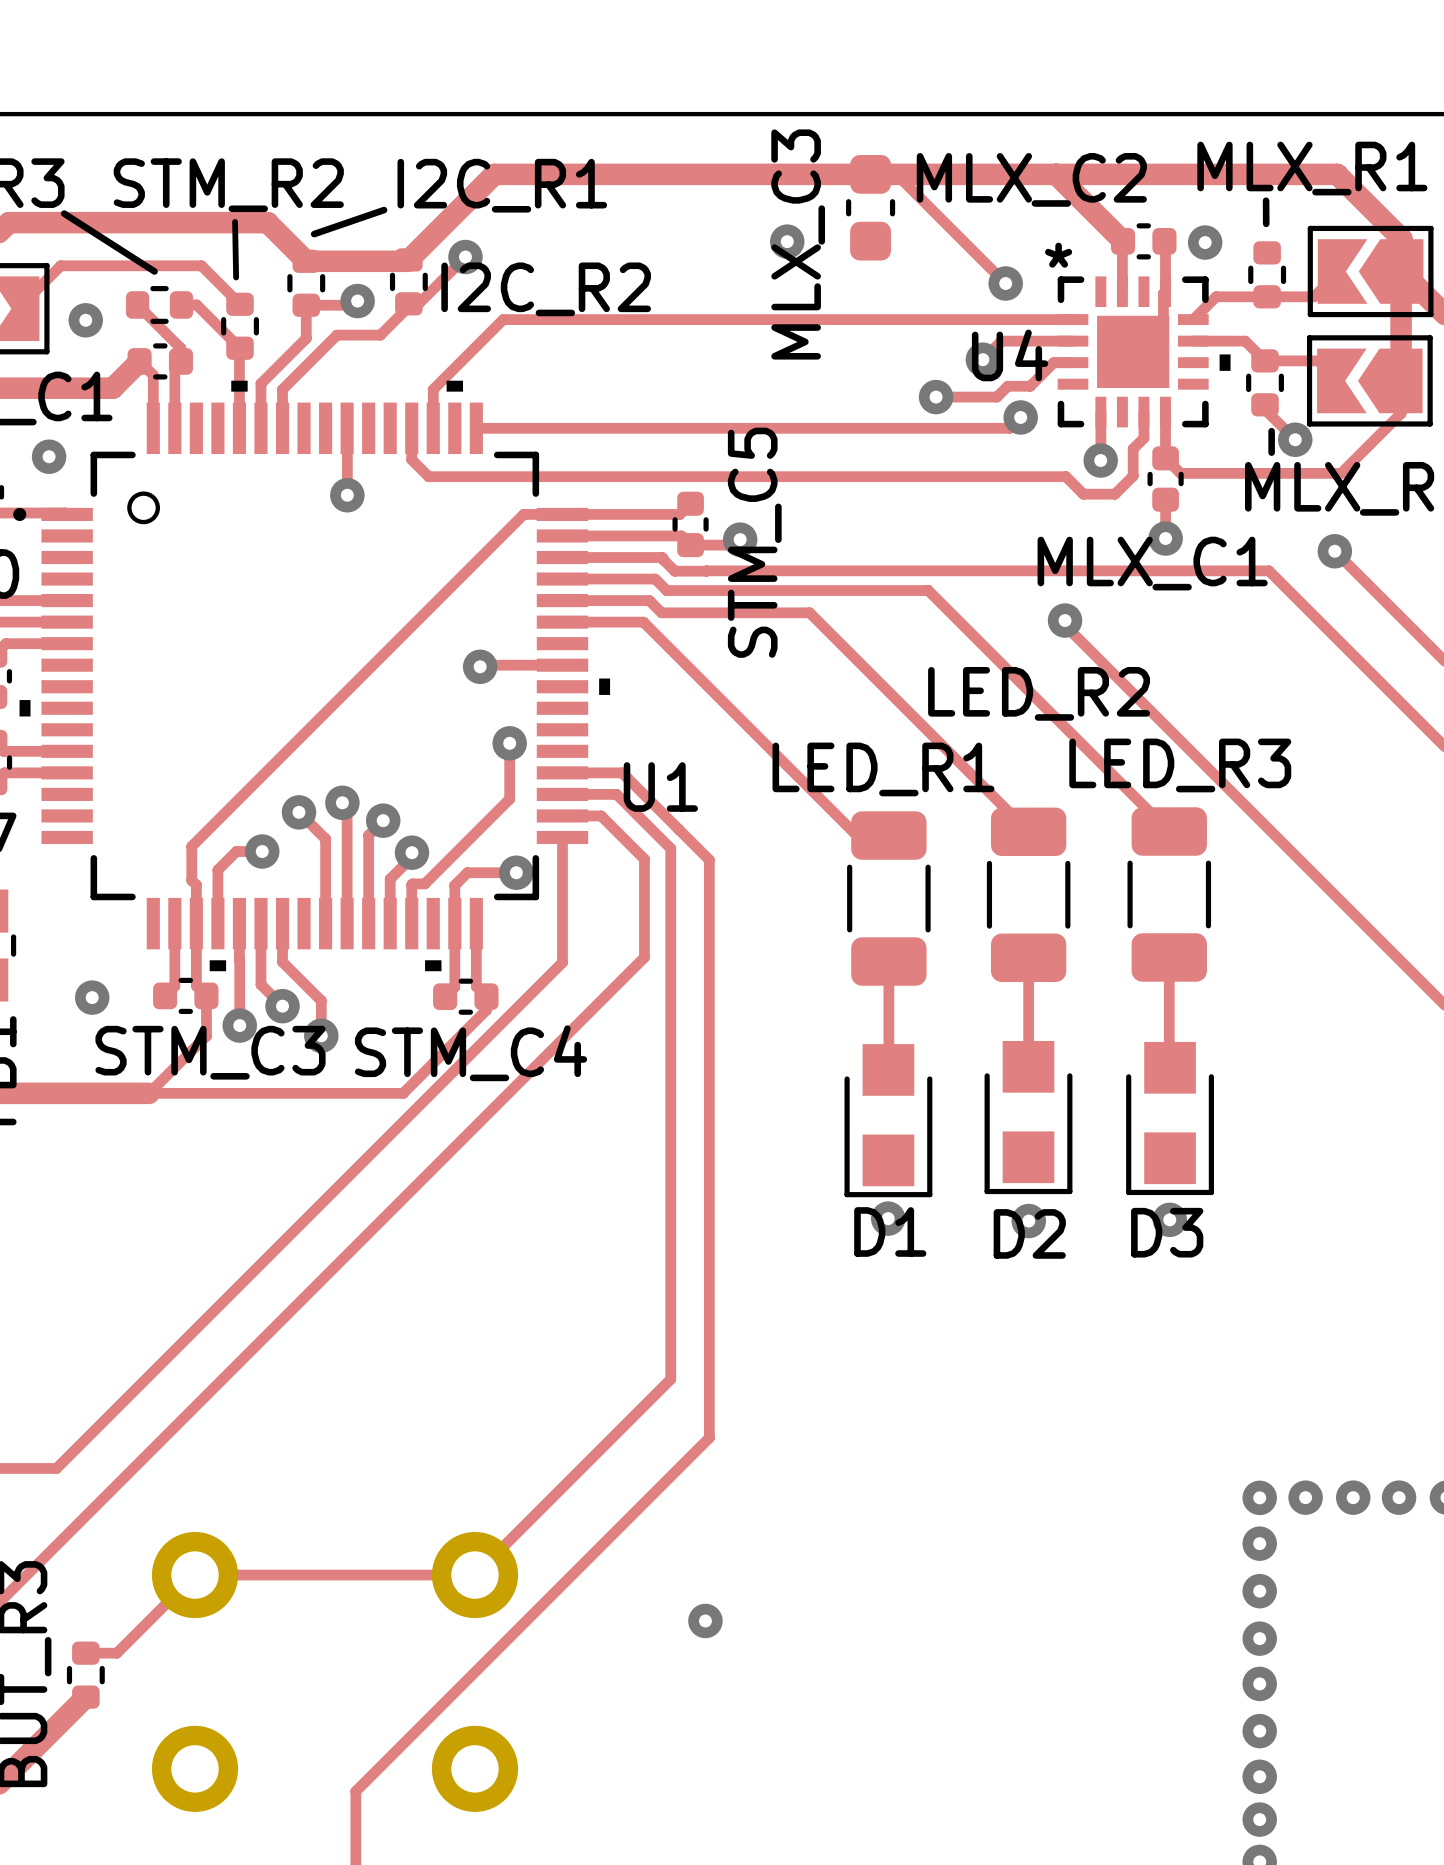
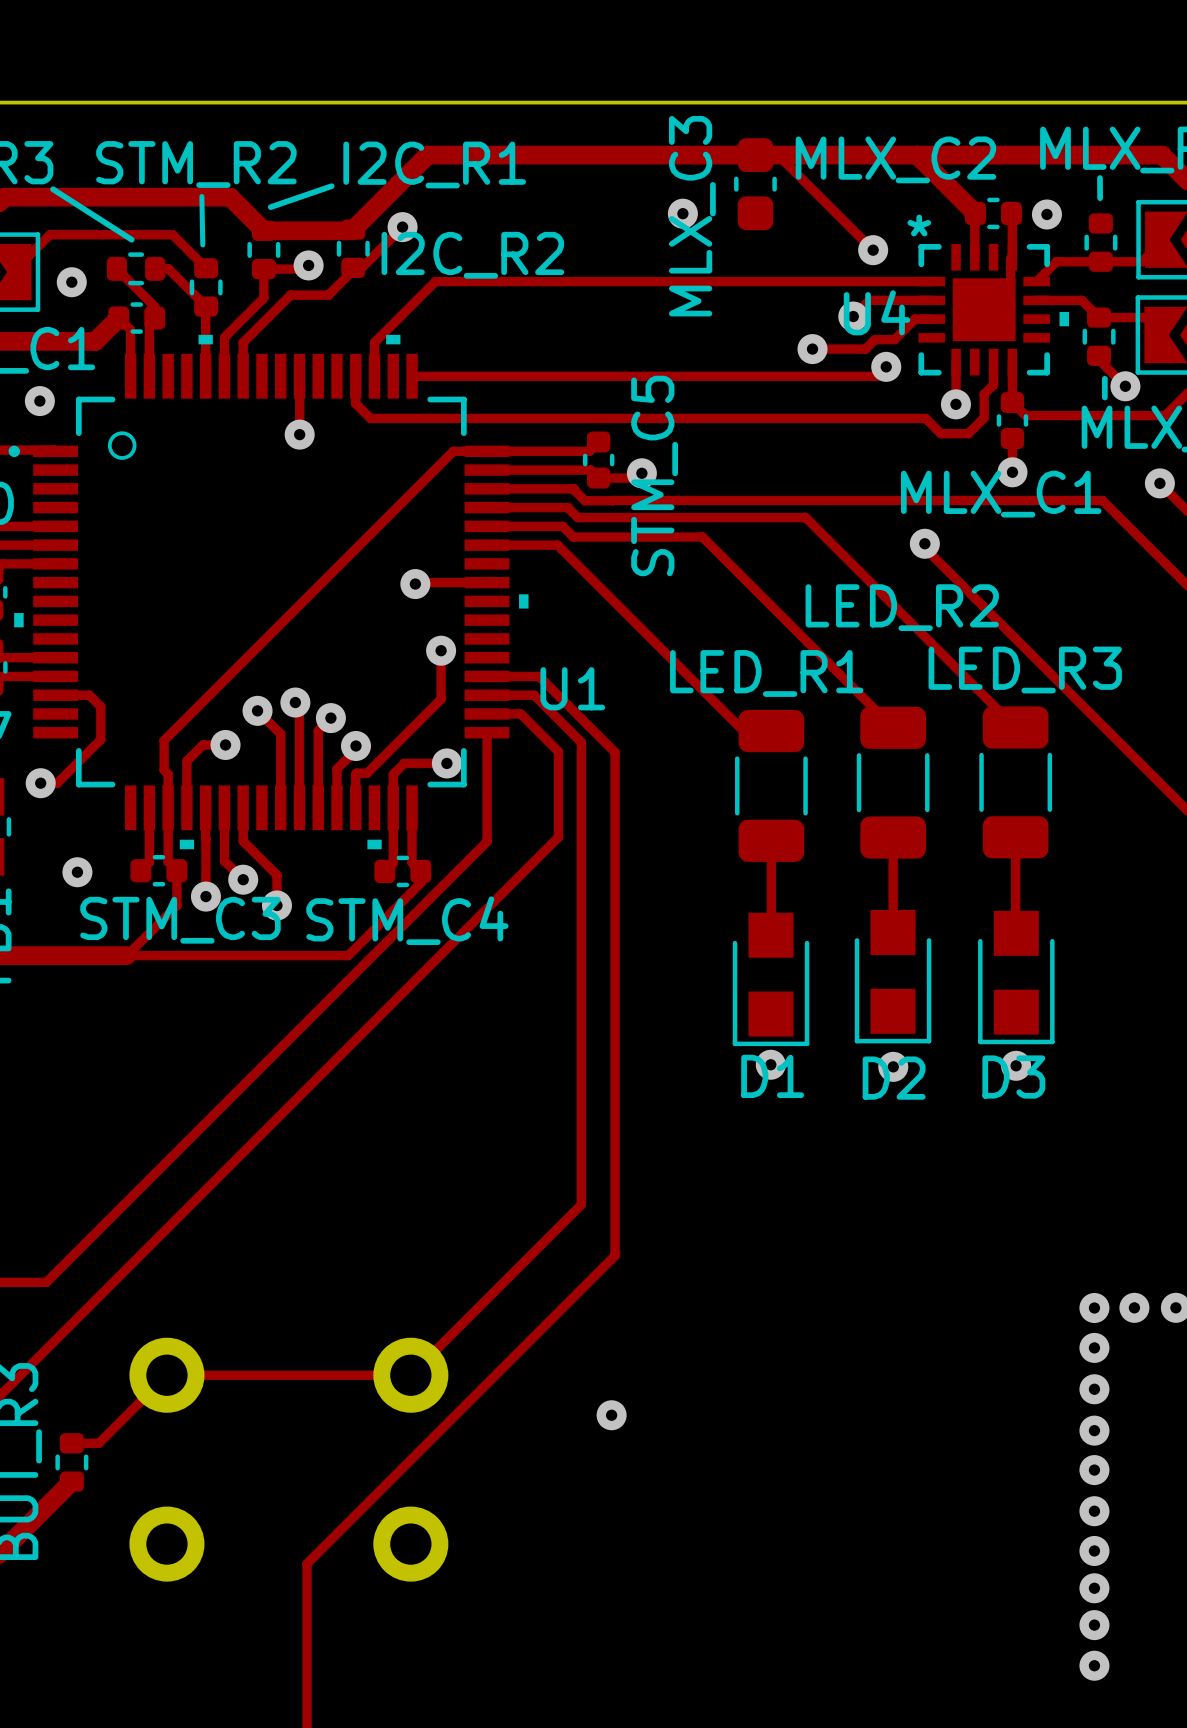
track: none -> (55, 695) (89, 695) (100, 706) (100, 739) (57, 783) (40, 783)
via: none -> (40, 783)

